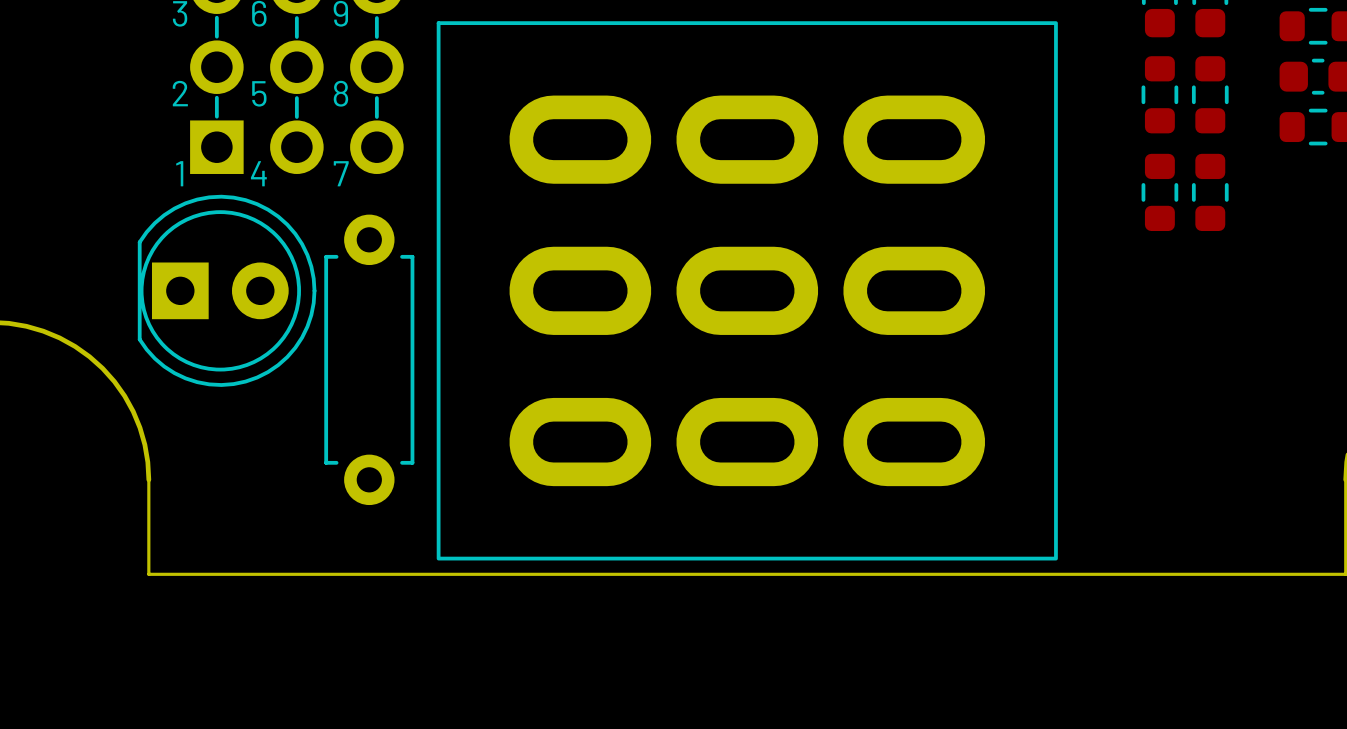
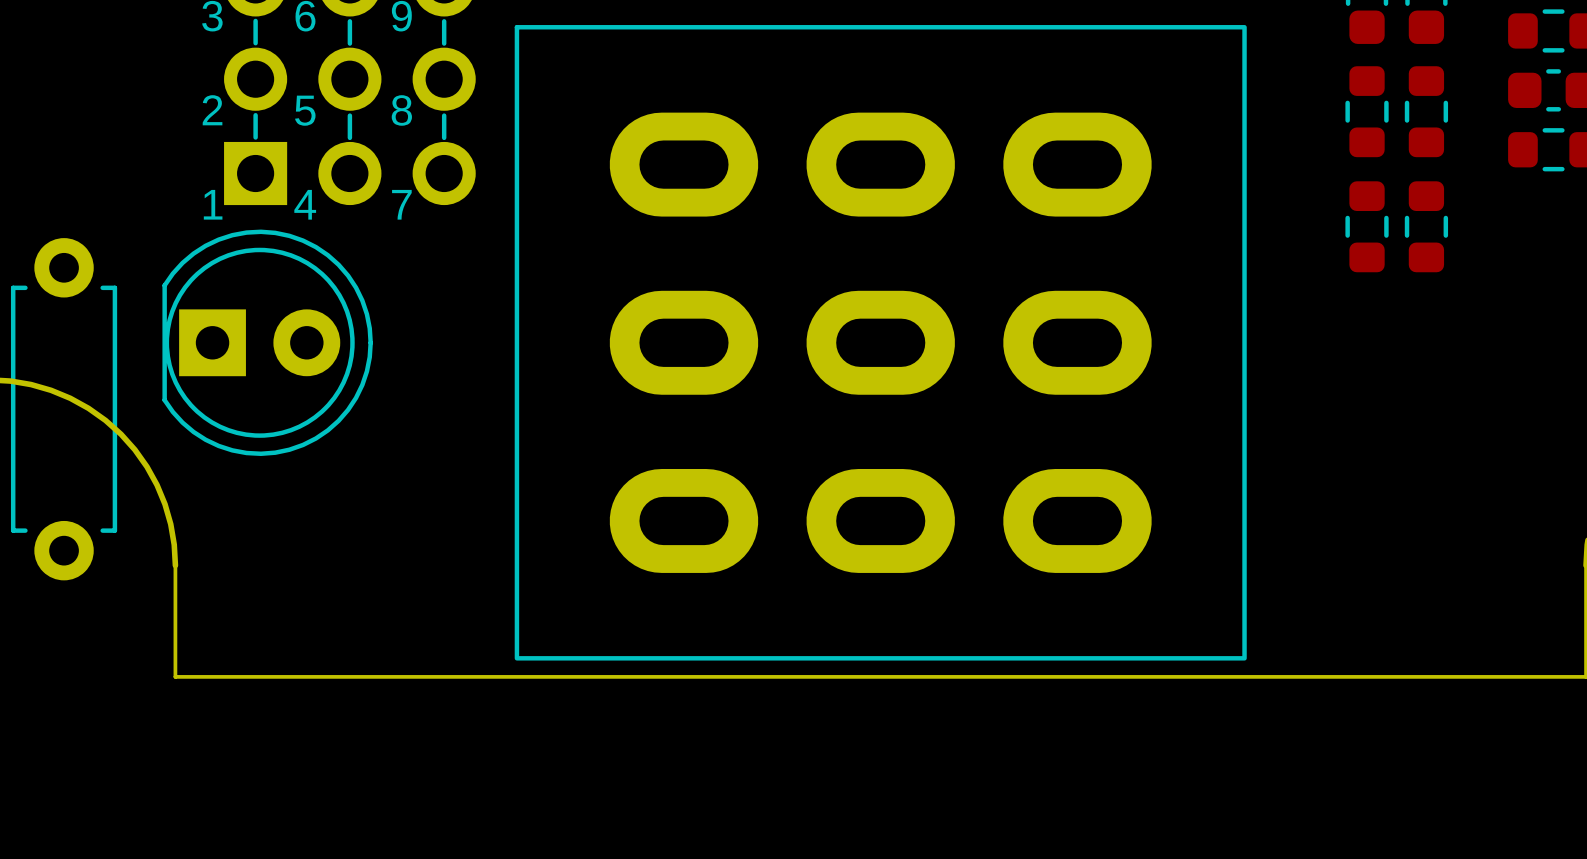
part footprint: [436, 21, 1058, 561] -> [514, 25, 1247, 661]
part position: (369, 359) -> (64, 409)

